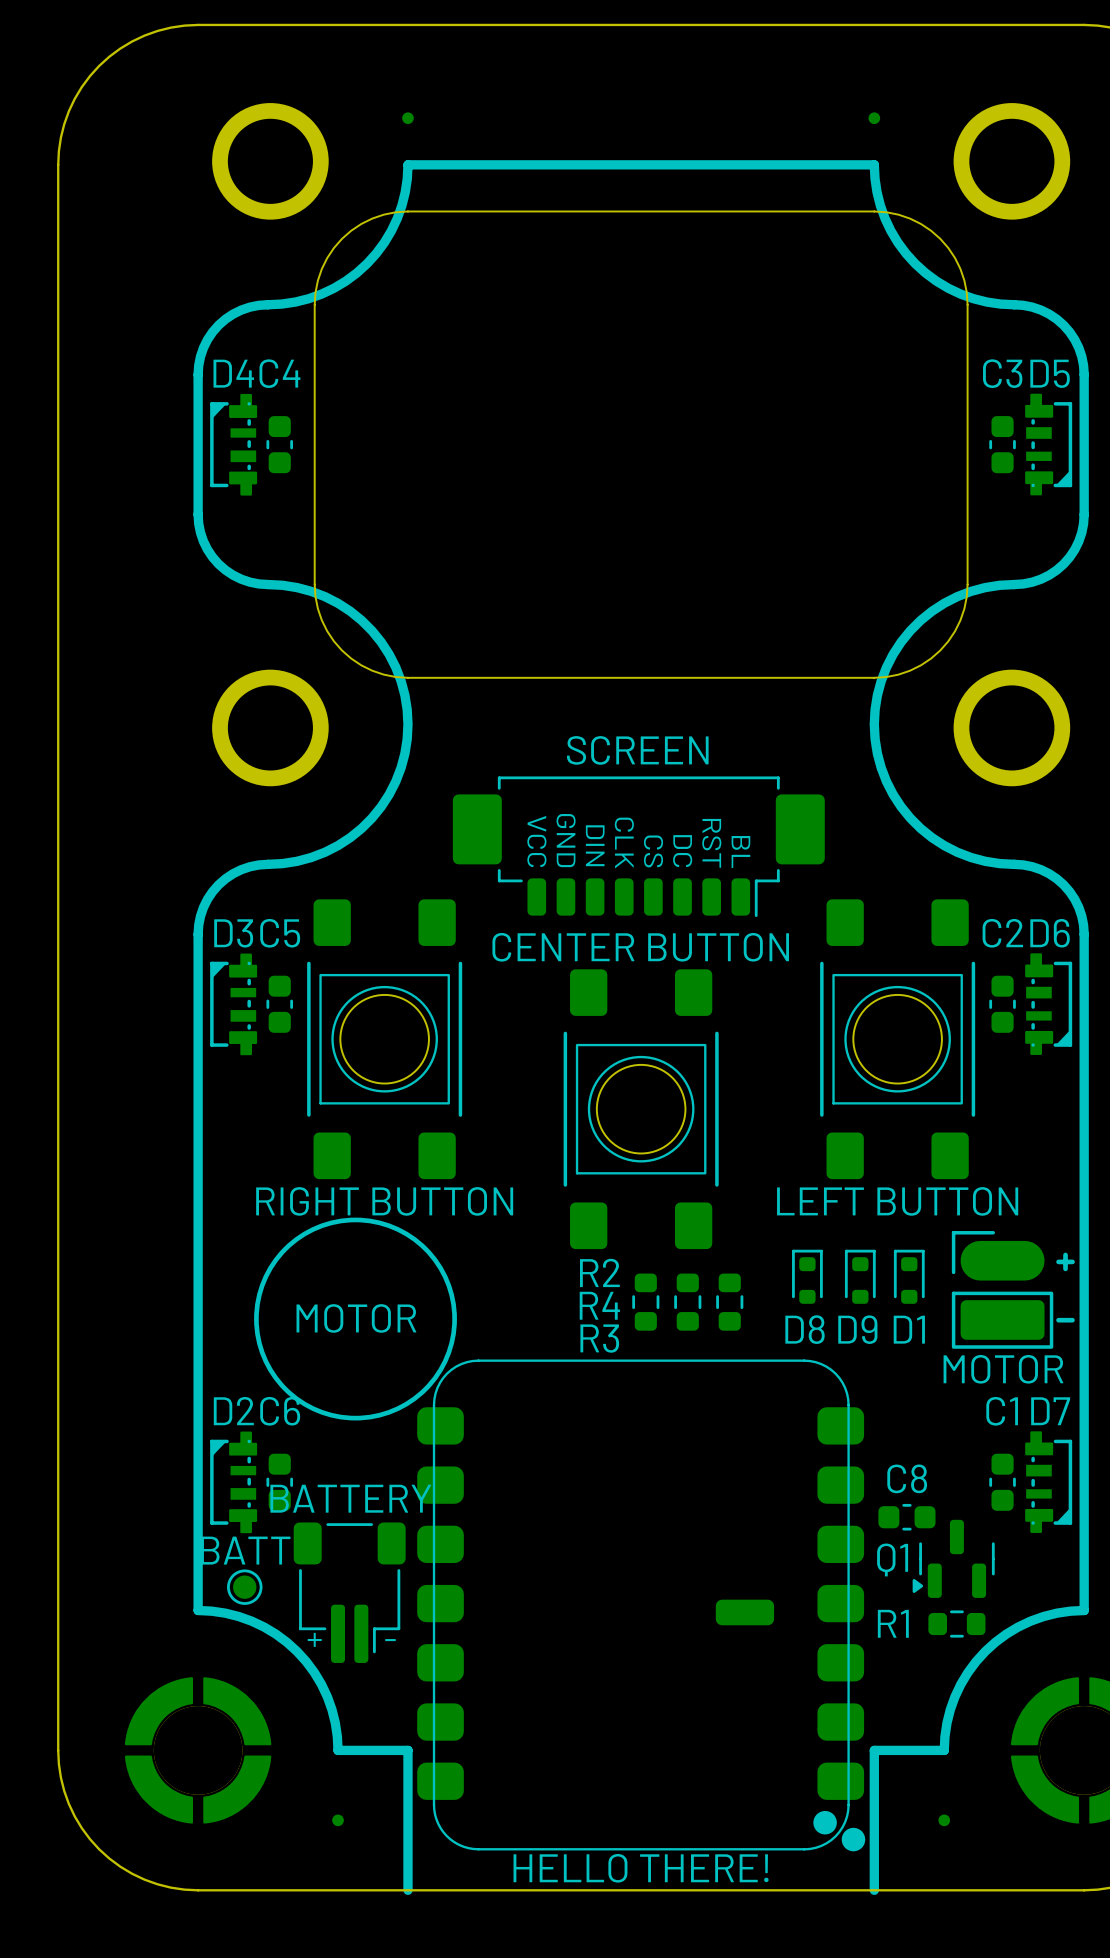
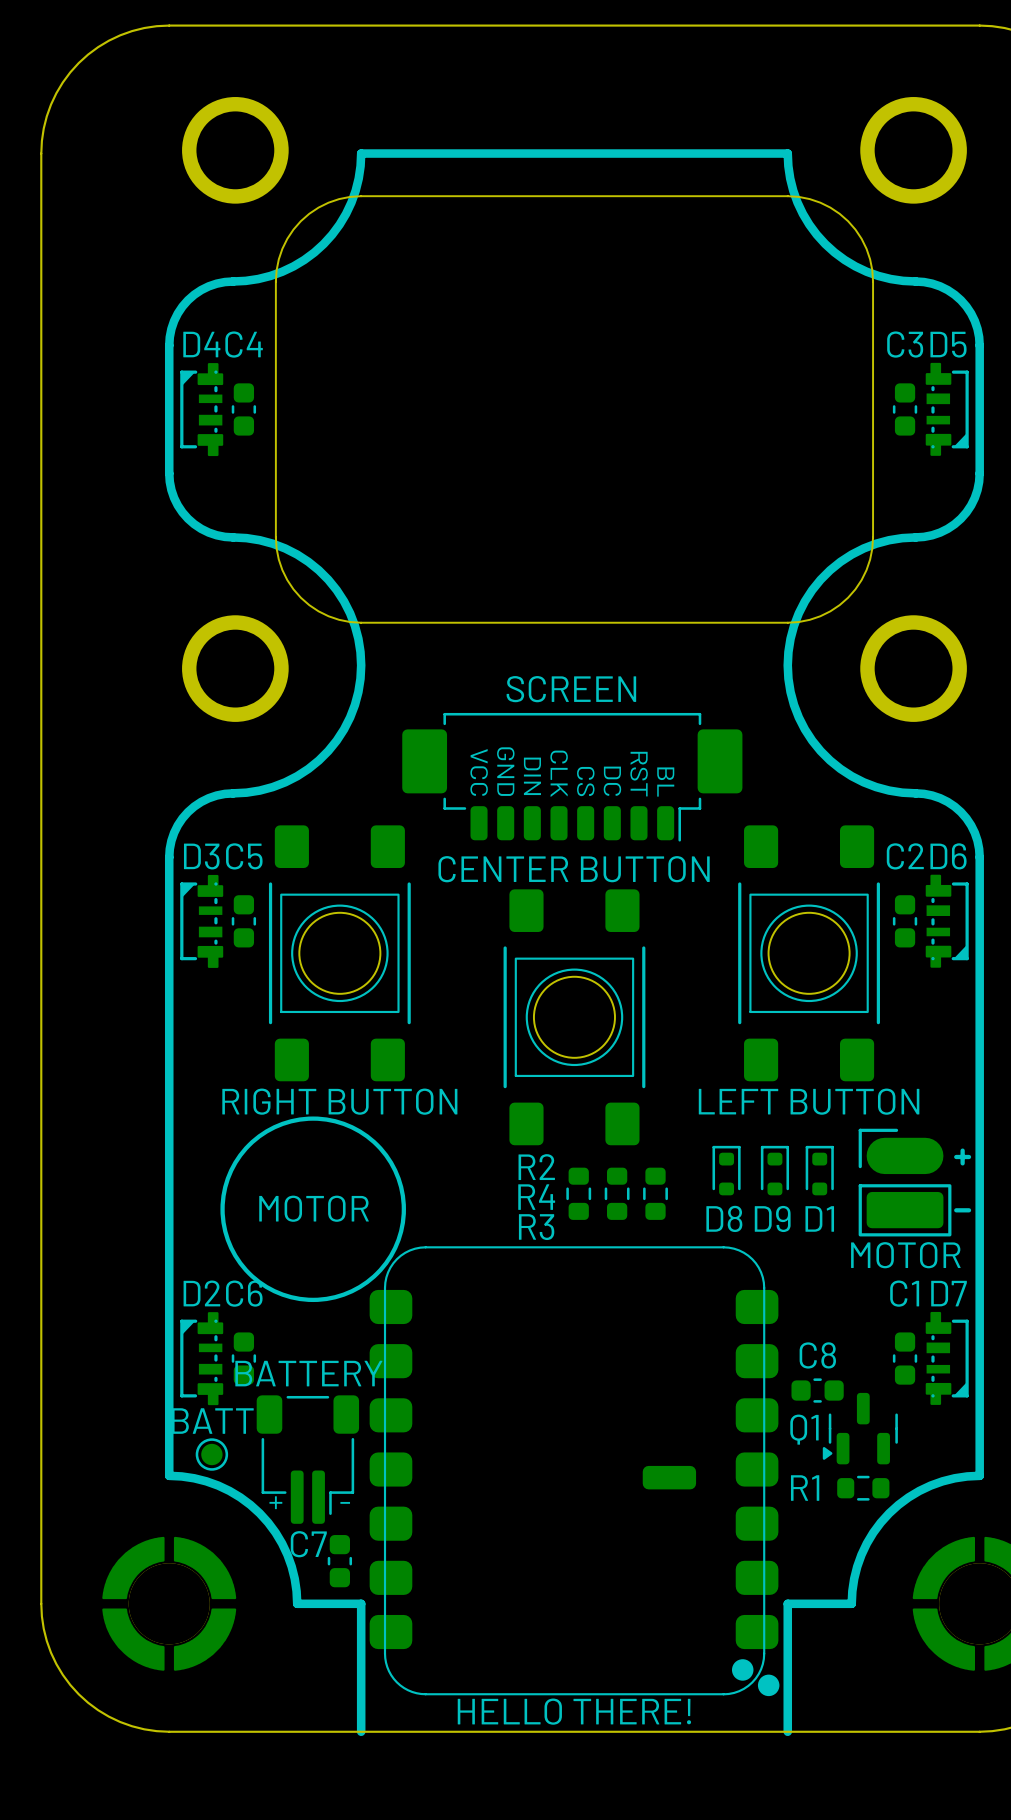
part: (407, 118) -> none
part: (874, 118) -> none
C7: none -> (339, 1561)
part: (338, 1820) -> none
part: (944, 1820) -> none

